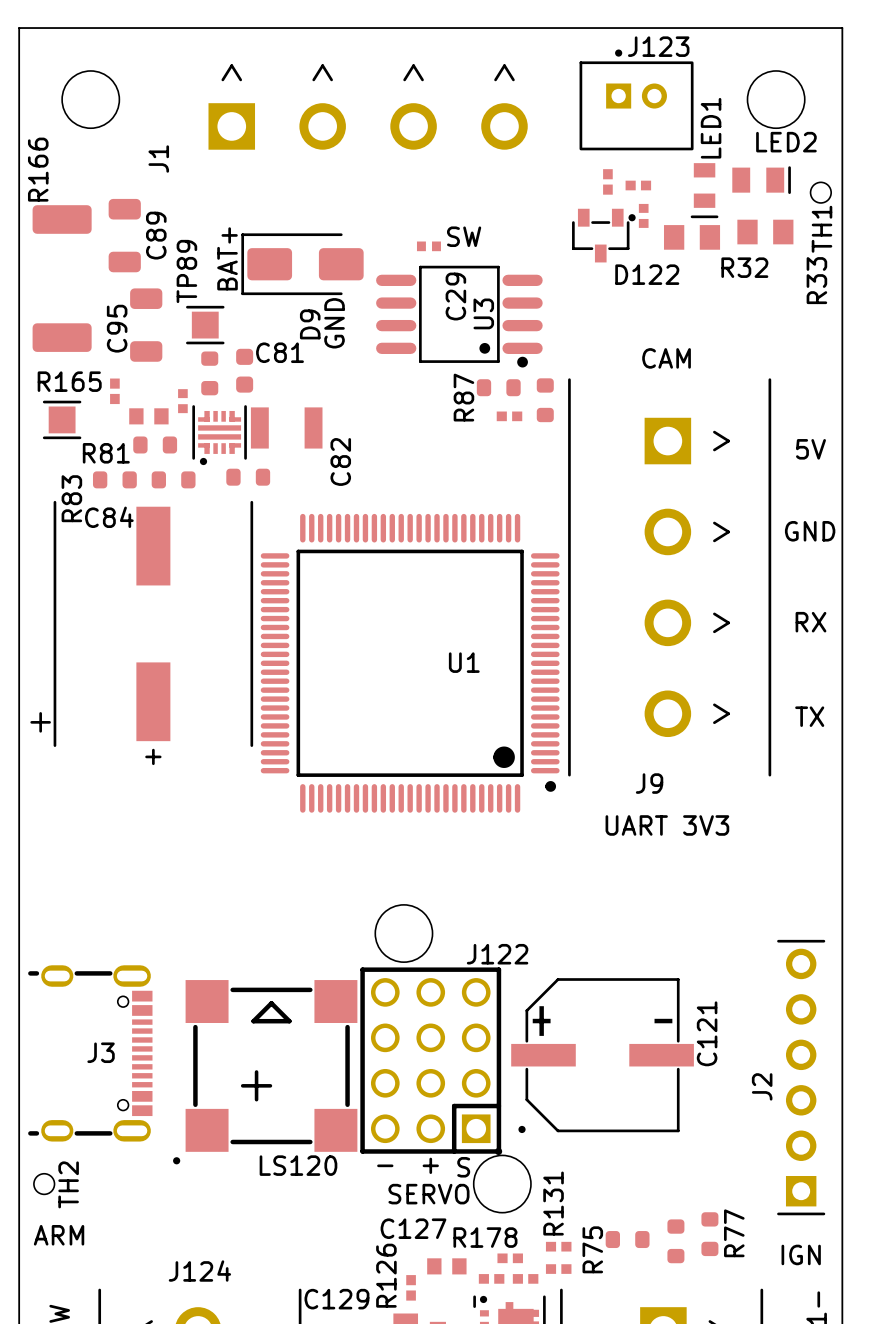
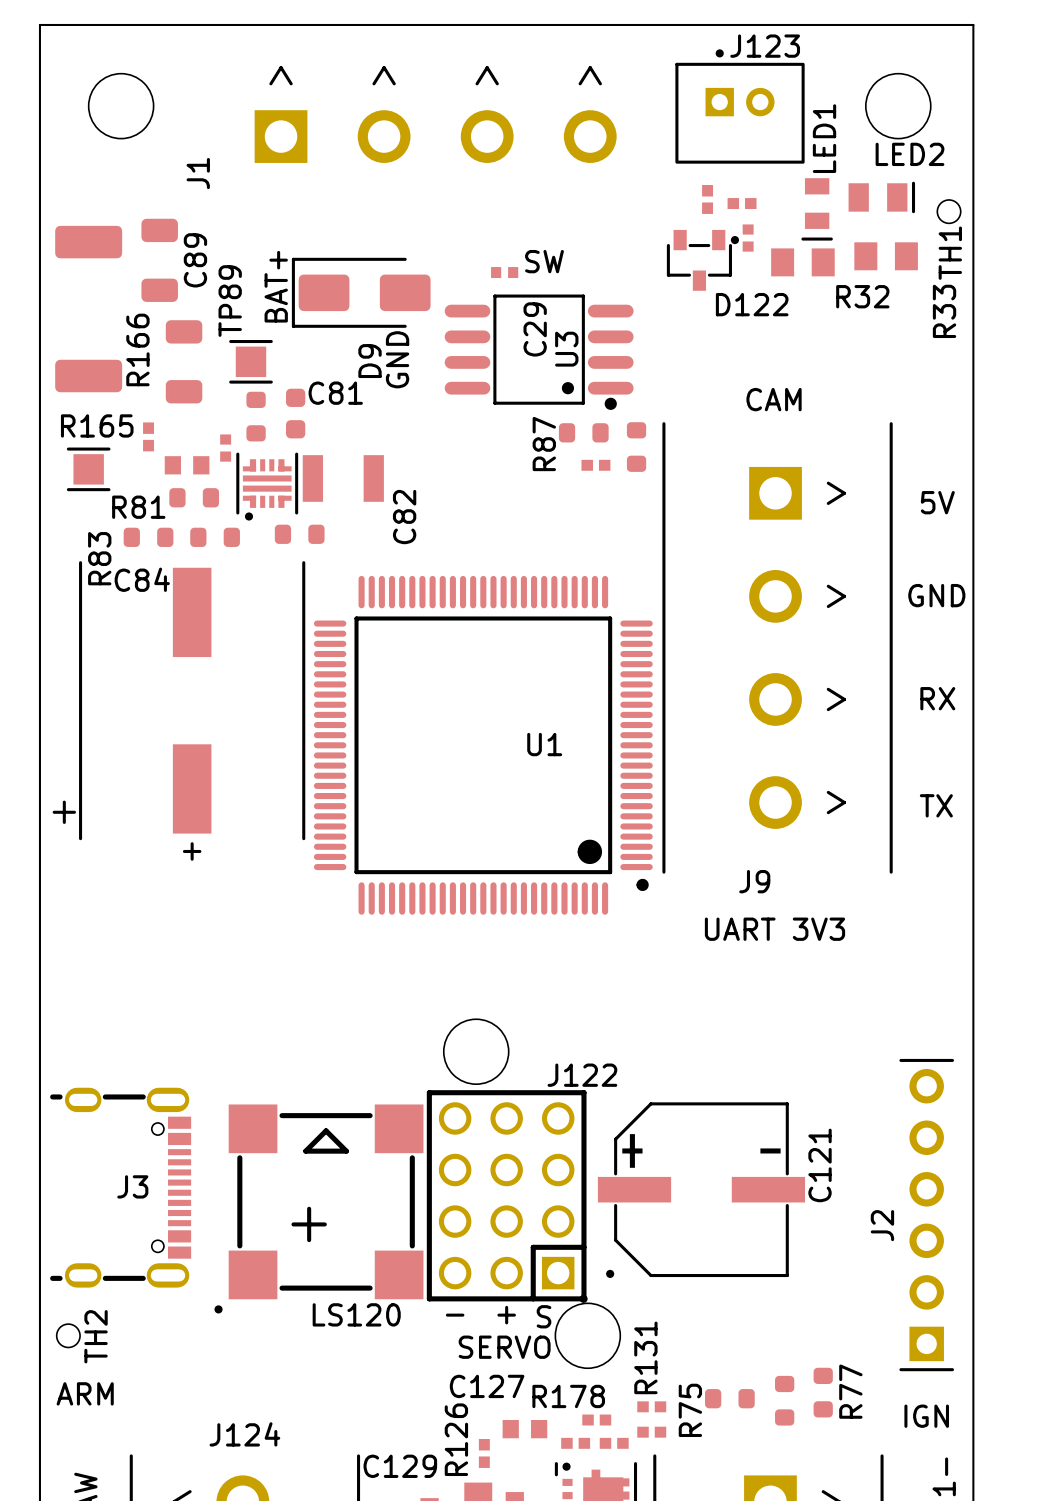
R166 name position: R166 (38, 169) -> R166 (137, 349)
C95 name: C95 (117, 328) -> none

